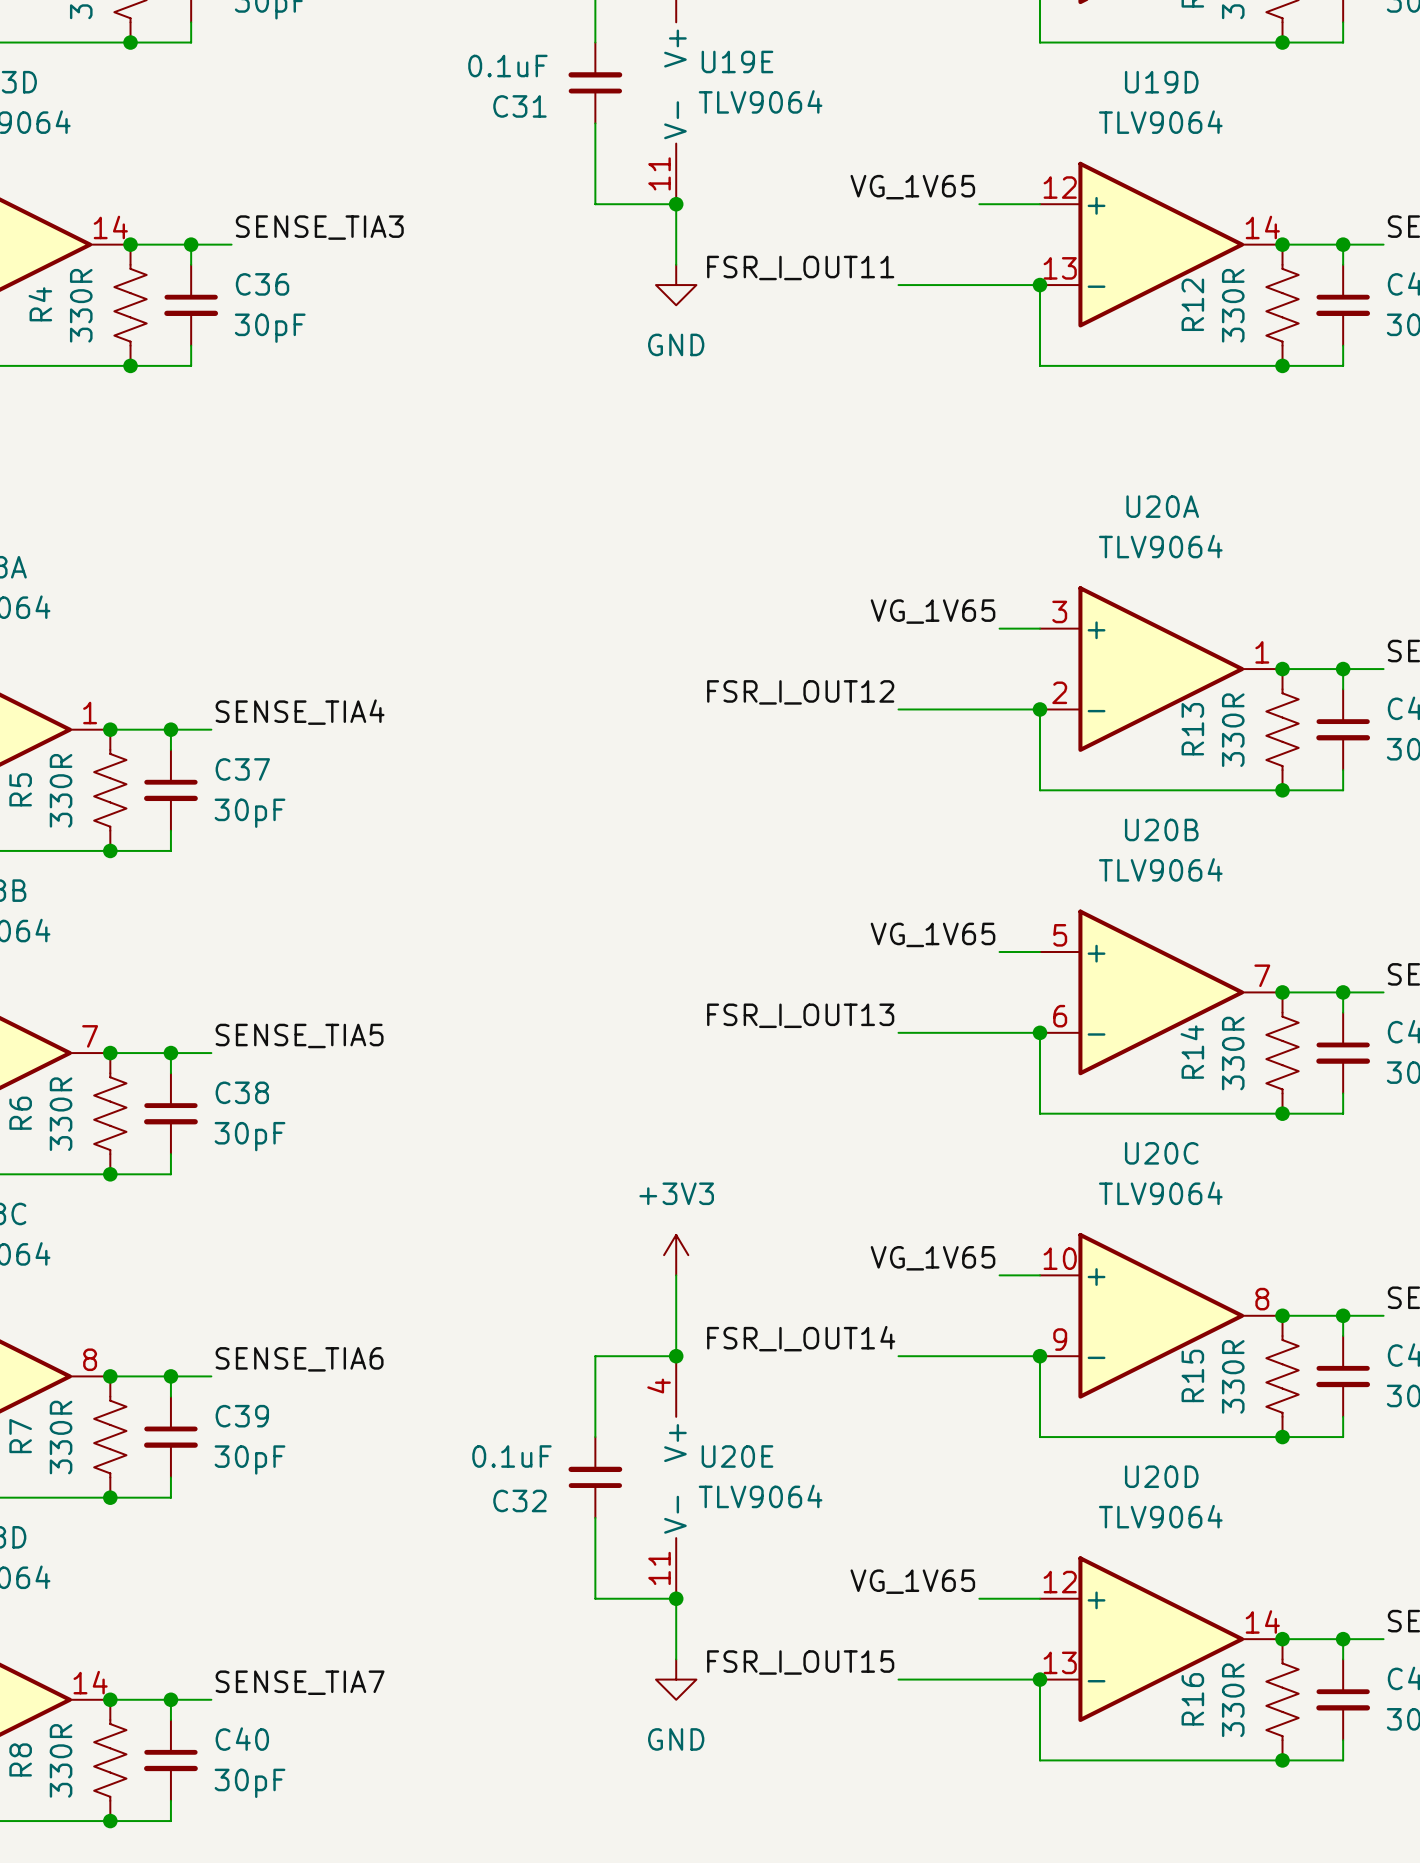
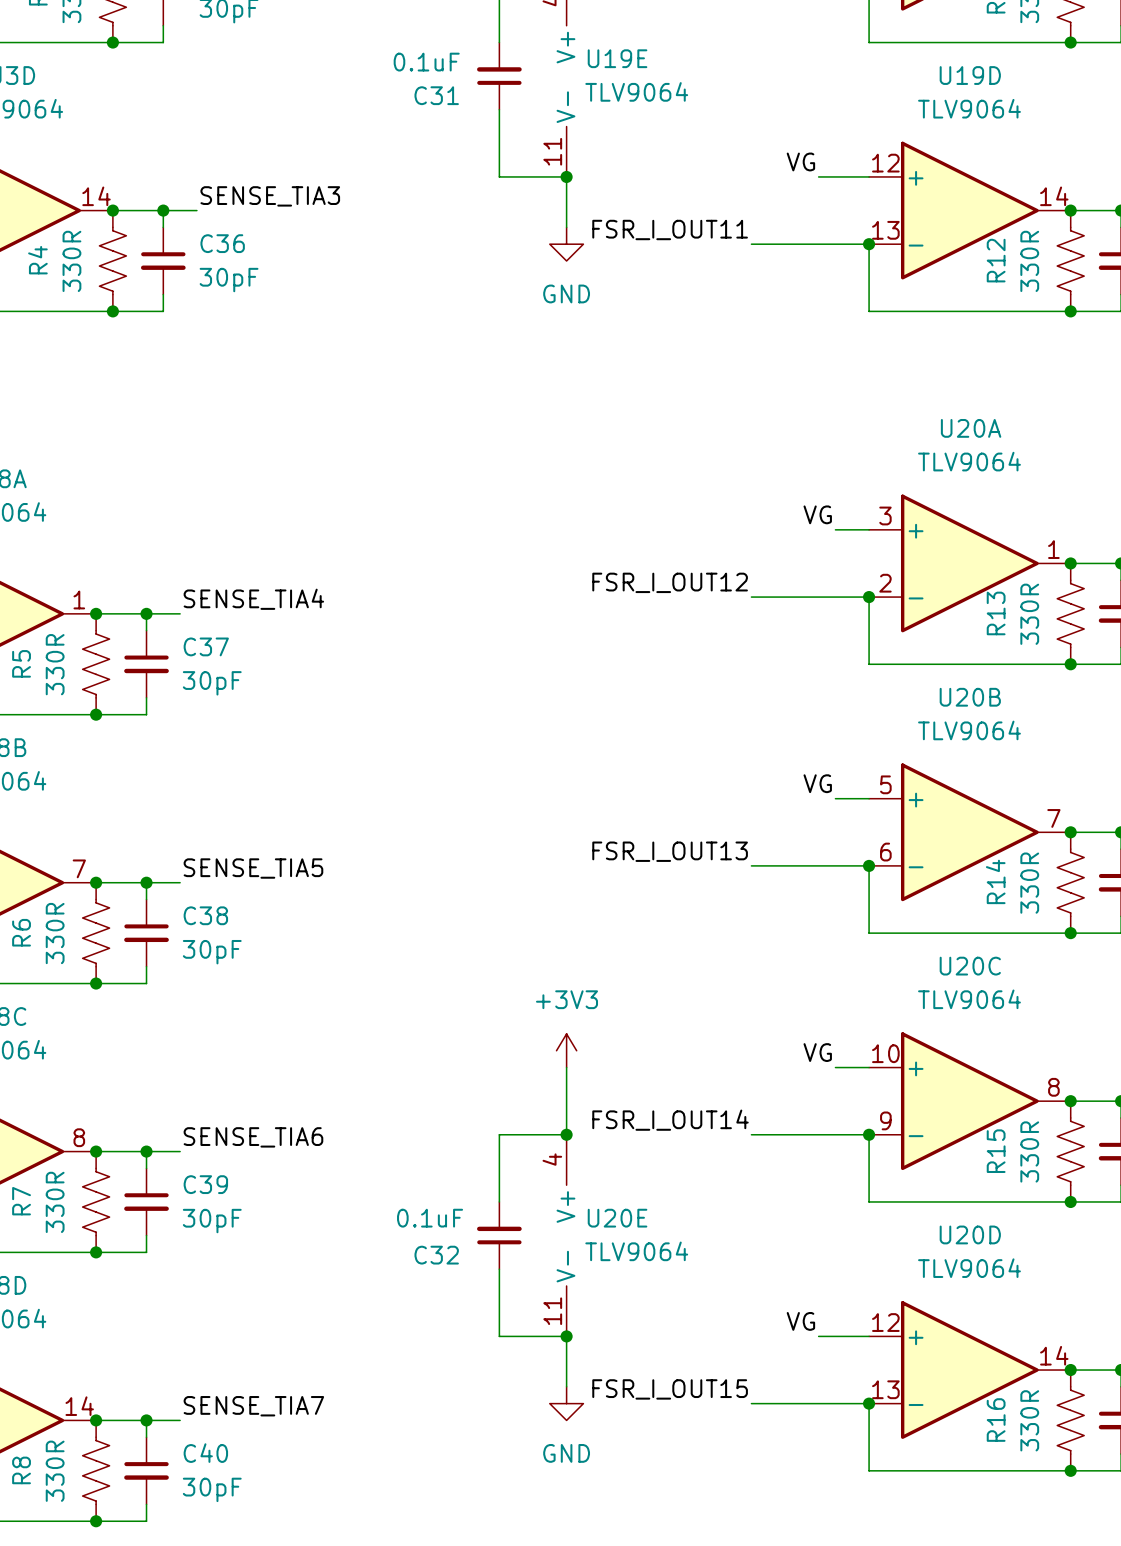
label: VG_1V65 (912, 187) -> VG (800, 161)
label: VG_1V65 (933, 611) -> VG (817, 514)
label: VG_1V65 (933, 934) -> VG (817, 783)
label: VG_1V65 (933, 1258) -> VG (817, 1052)
label: VG_1V65 (912, 1581) -> VG (800, 1321)

